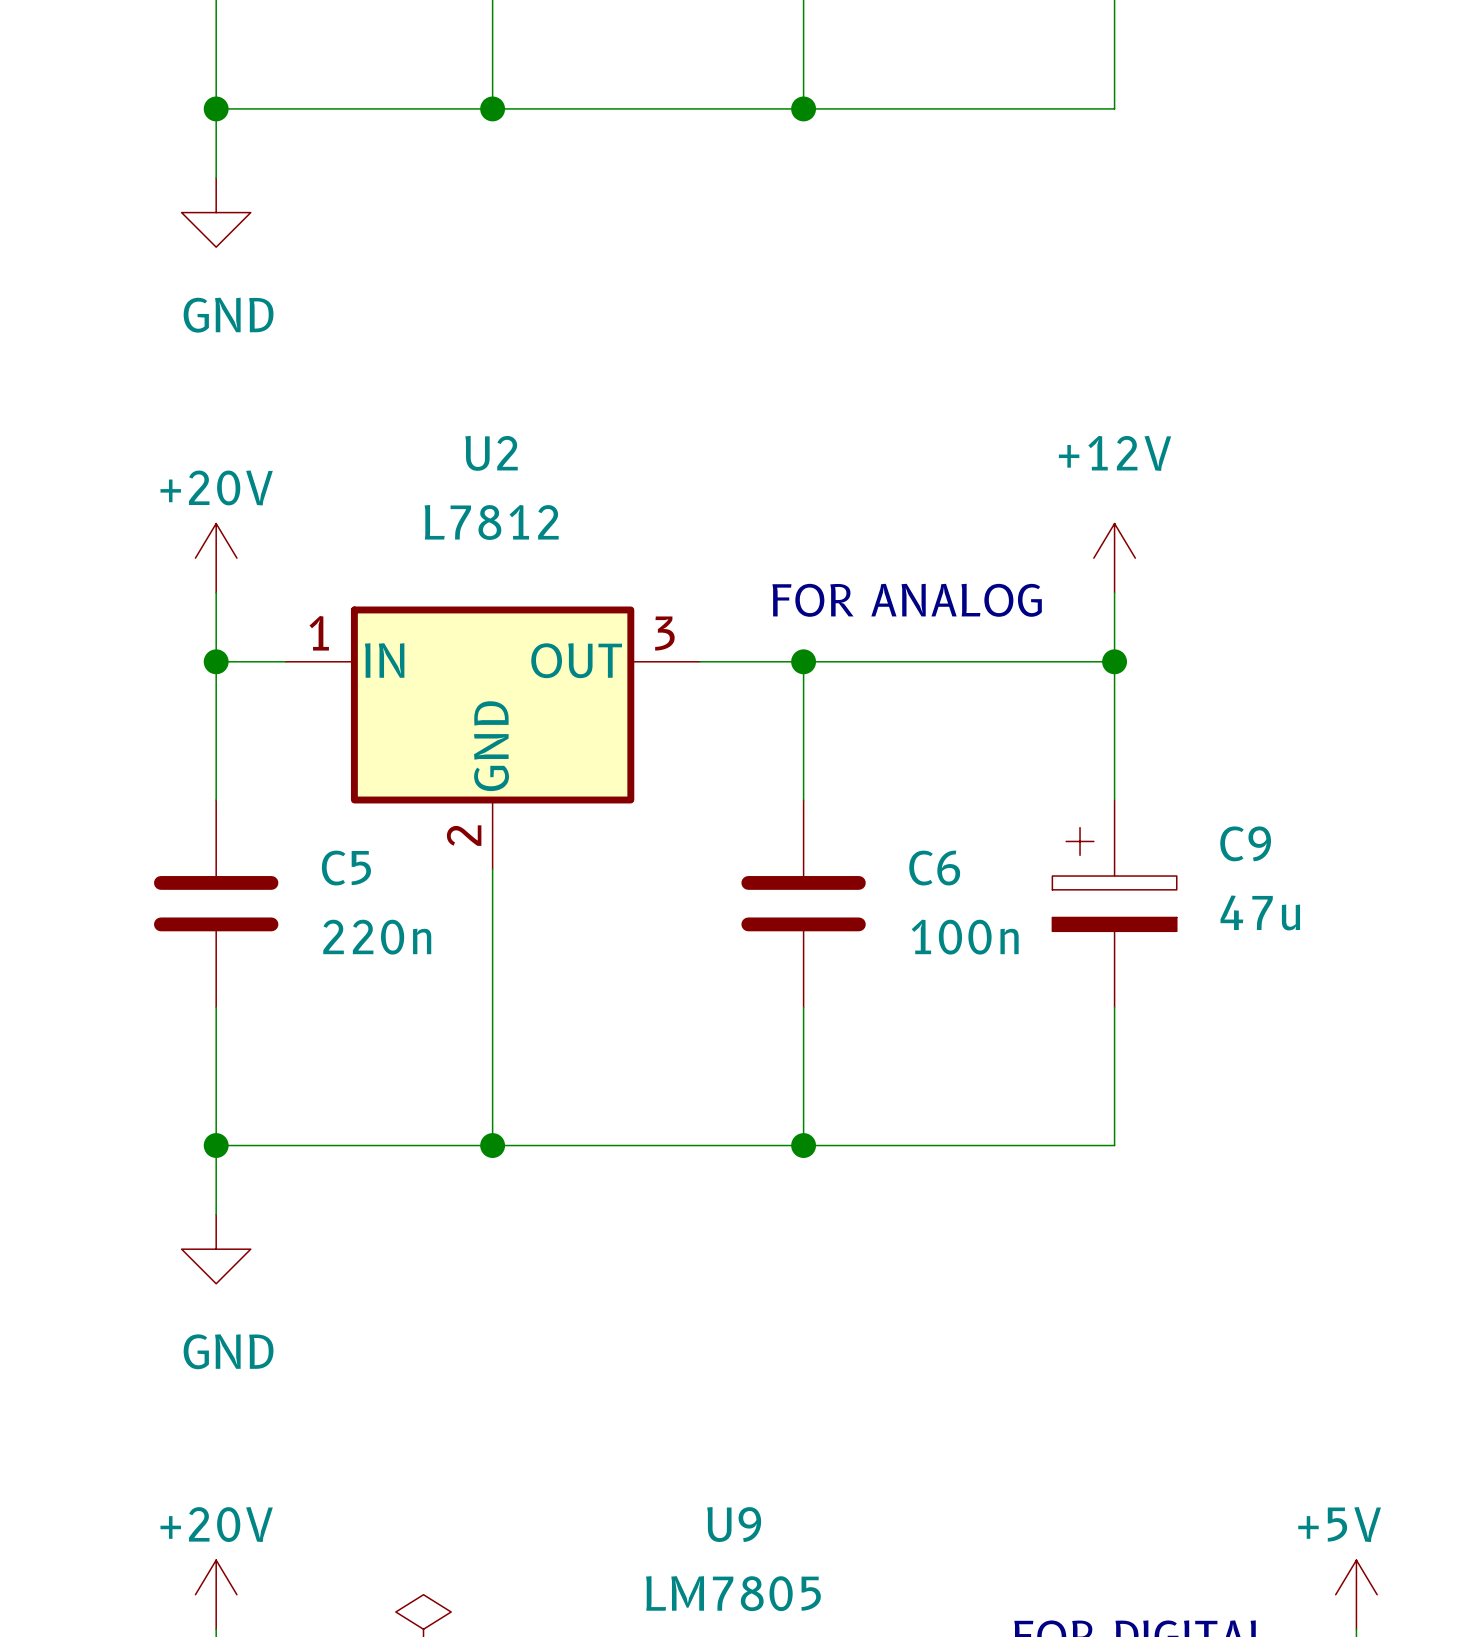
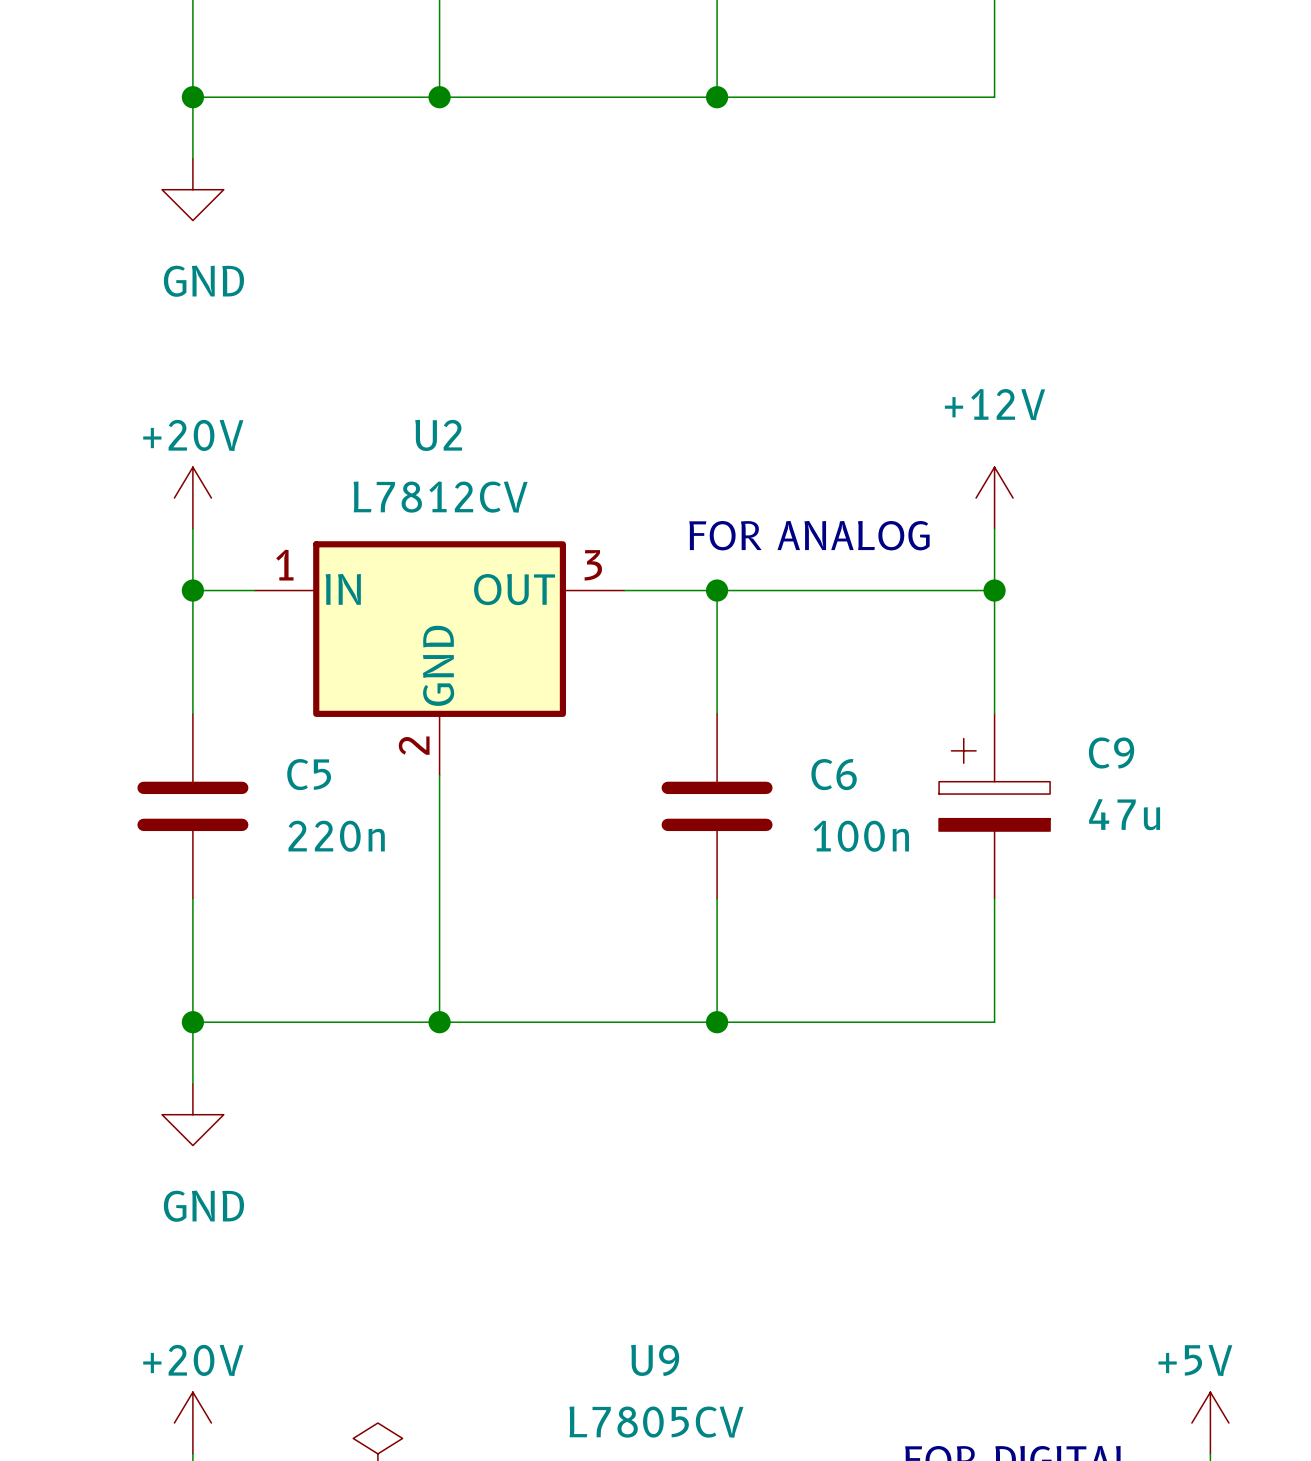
U2 name position: U2 (491, 453) -> U2 (438, 435)
U2 value: L7812 (491, 522) -> L7812CV (440, 497)
U9 value: LM7805 (733, 1593) -> L7805CV (656, 1422)

